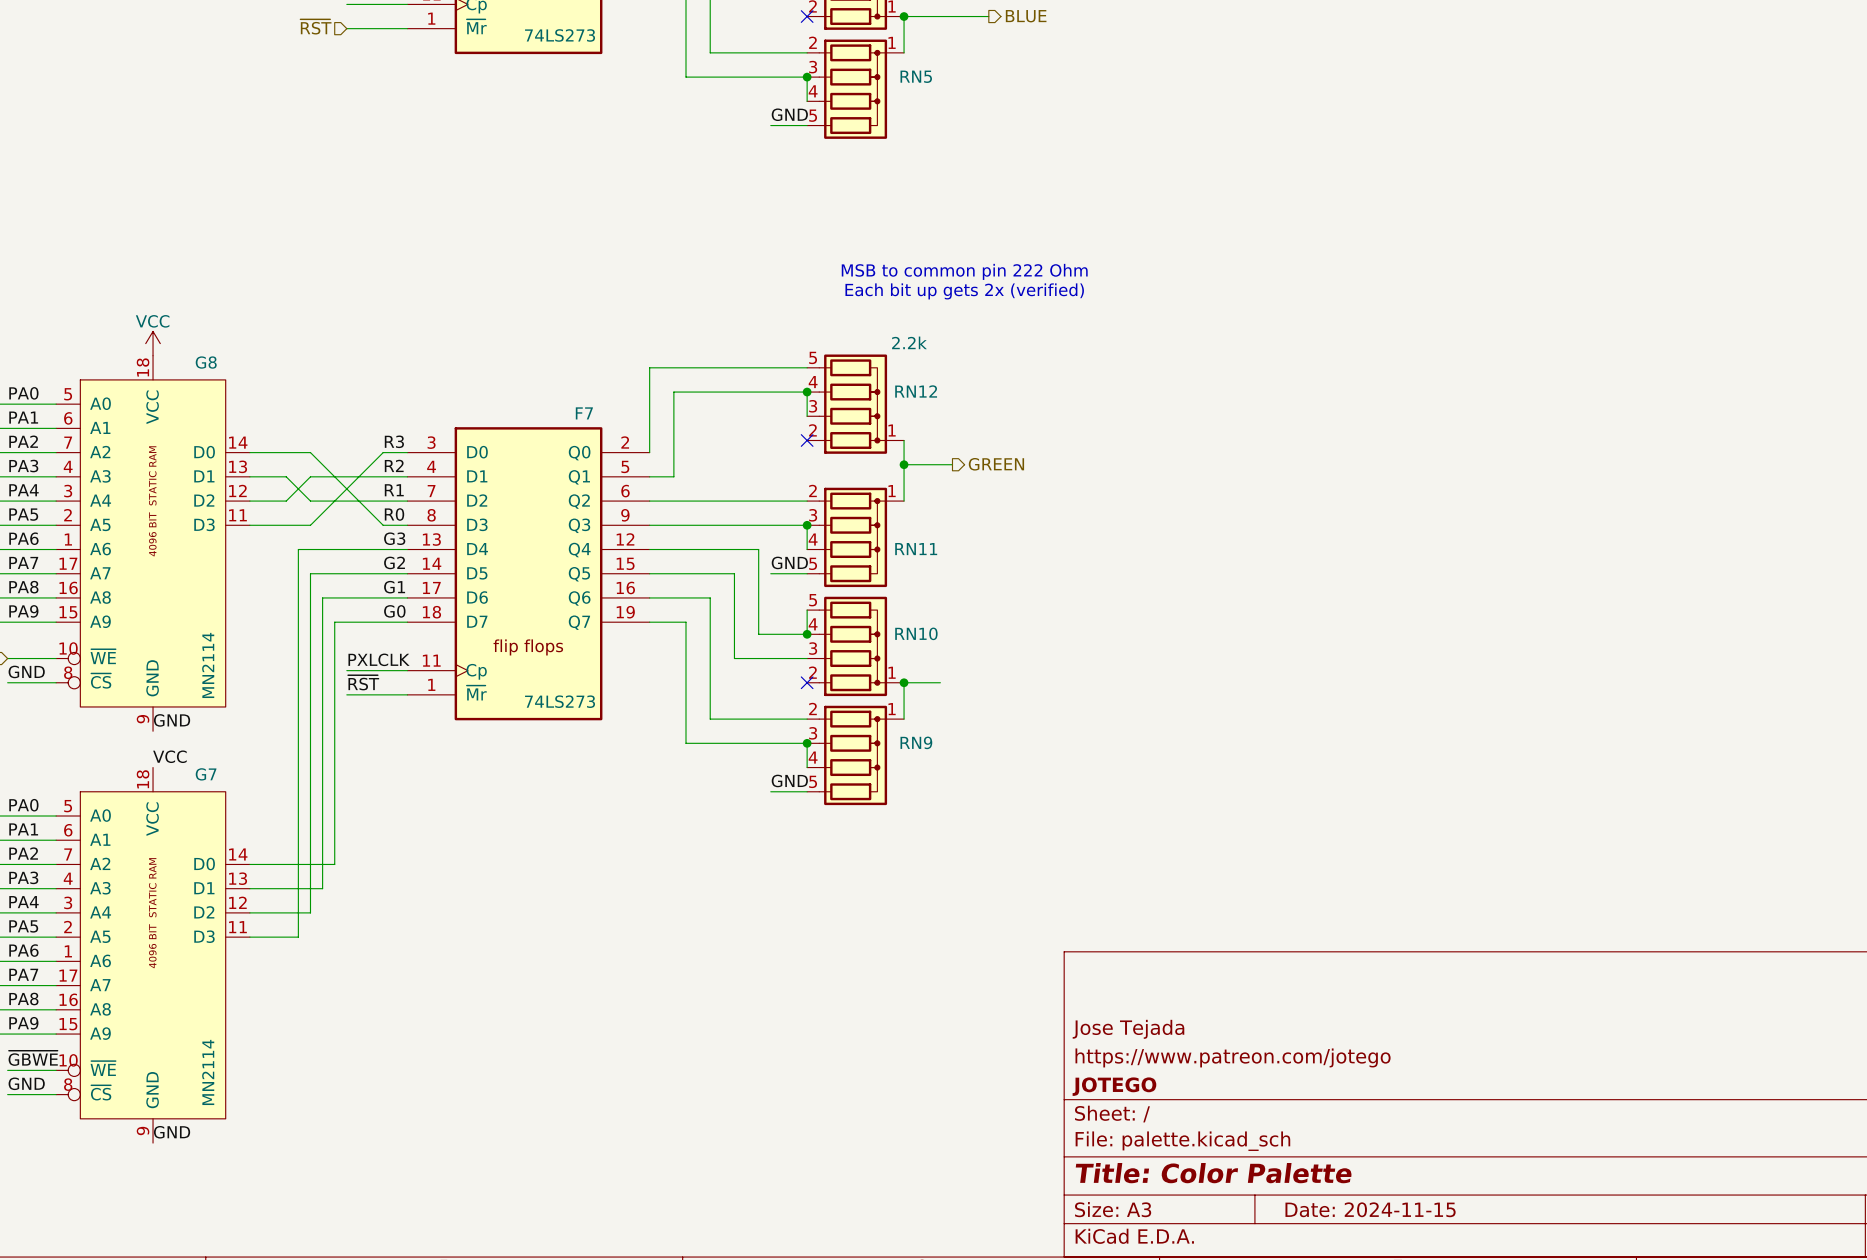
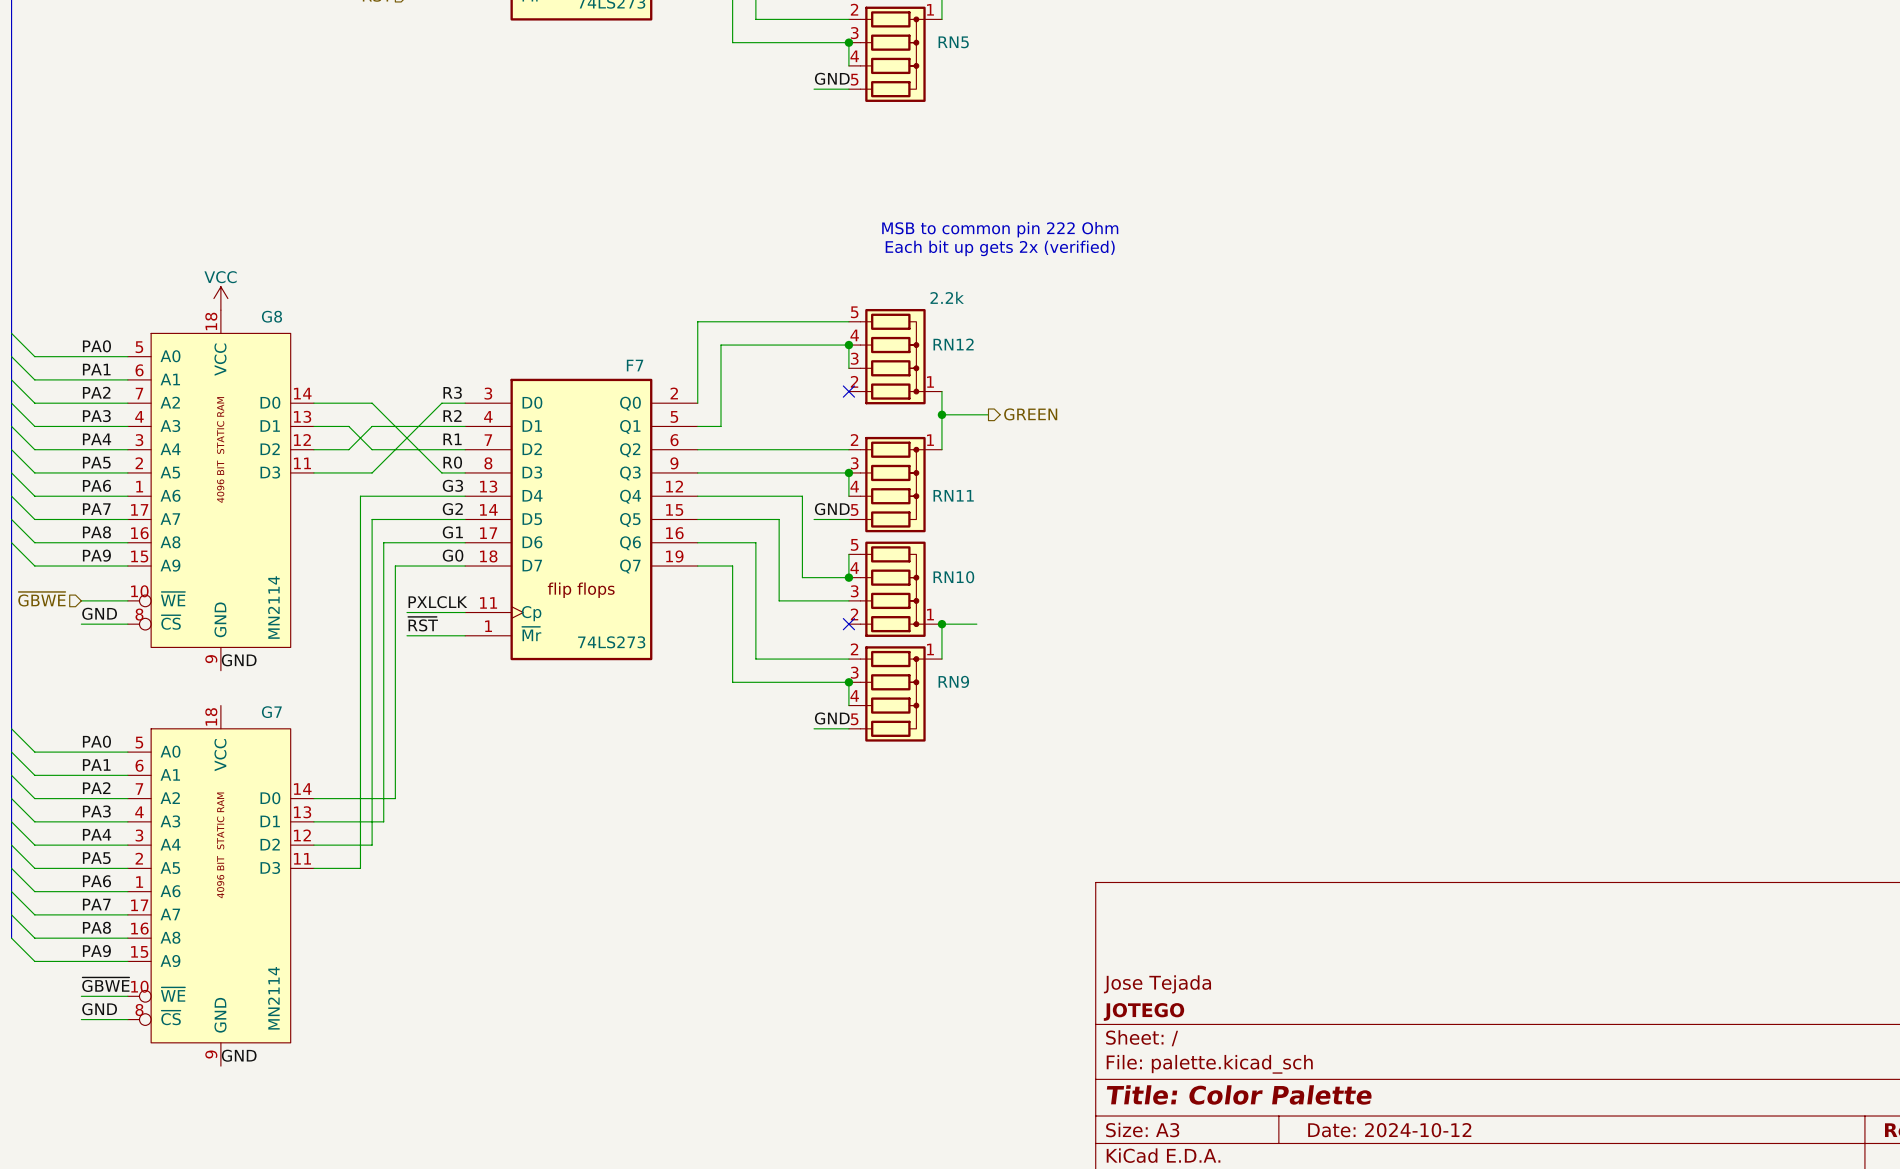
label: VCC (169, 756) -> none
title block: Jose Tejada (1128, 1029) -> none
title block: https://www.patreon.com/jotego (1233, 1057) -> Jose Tejada (1157, 984)
title block: Date: 2024-11-15 (1370, 1209) -> Date: 2024-10-12 (1389, 1130)

